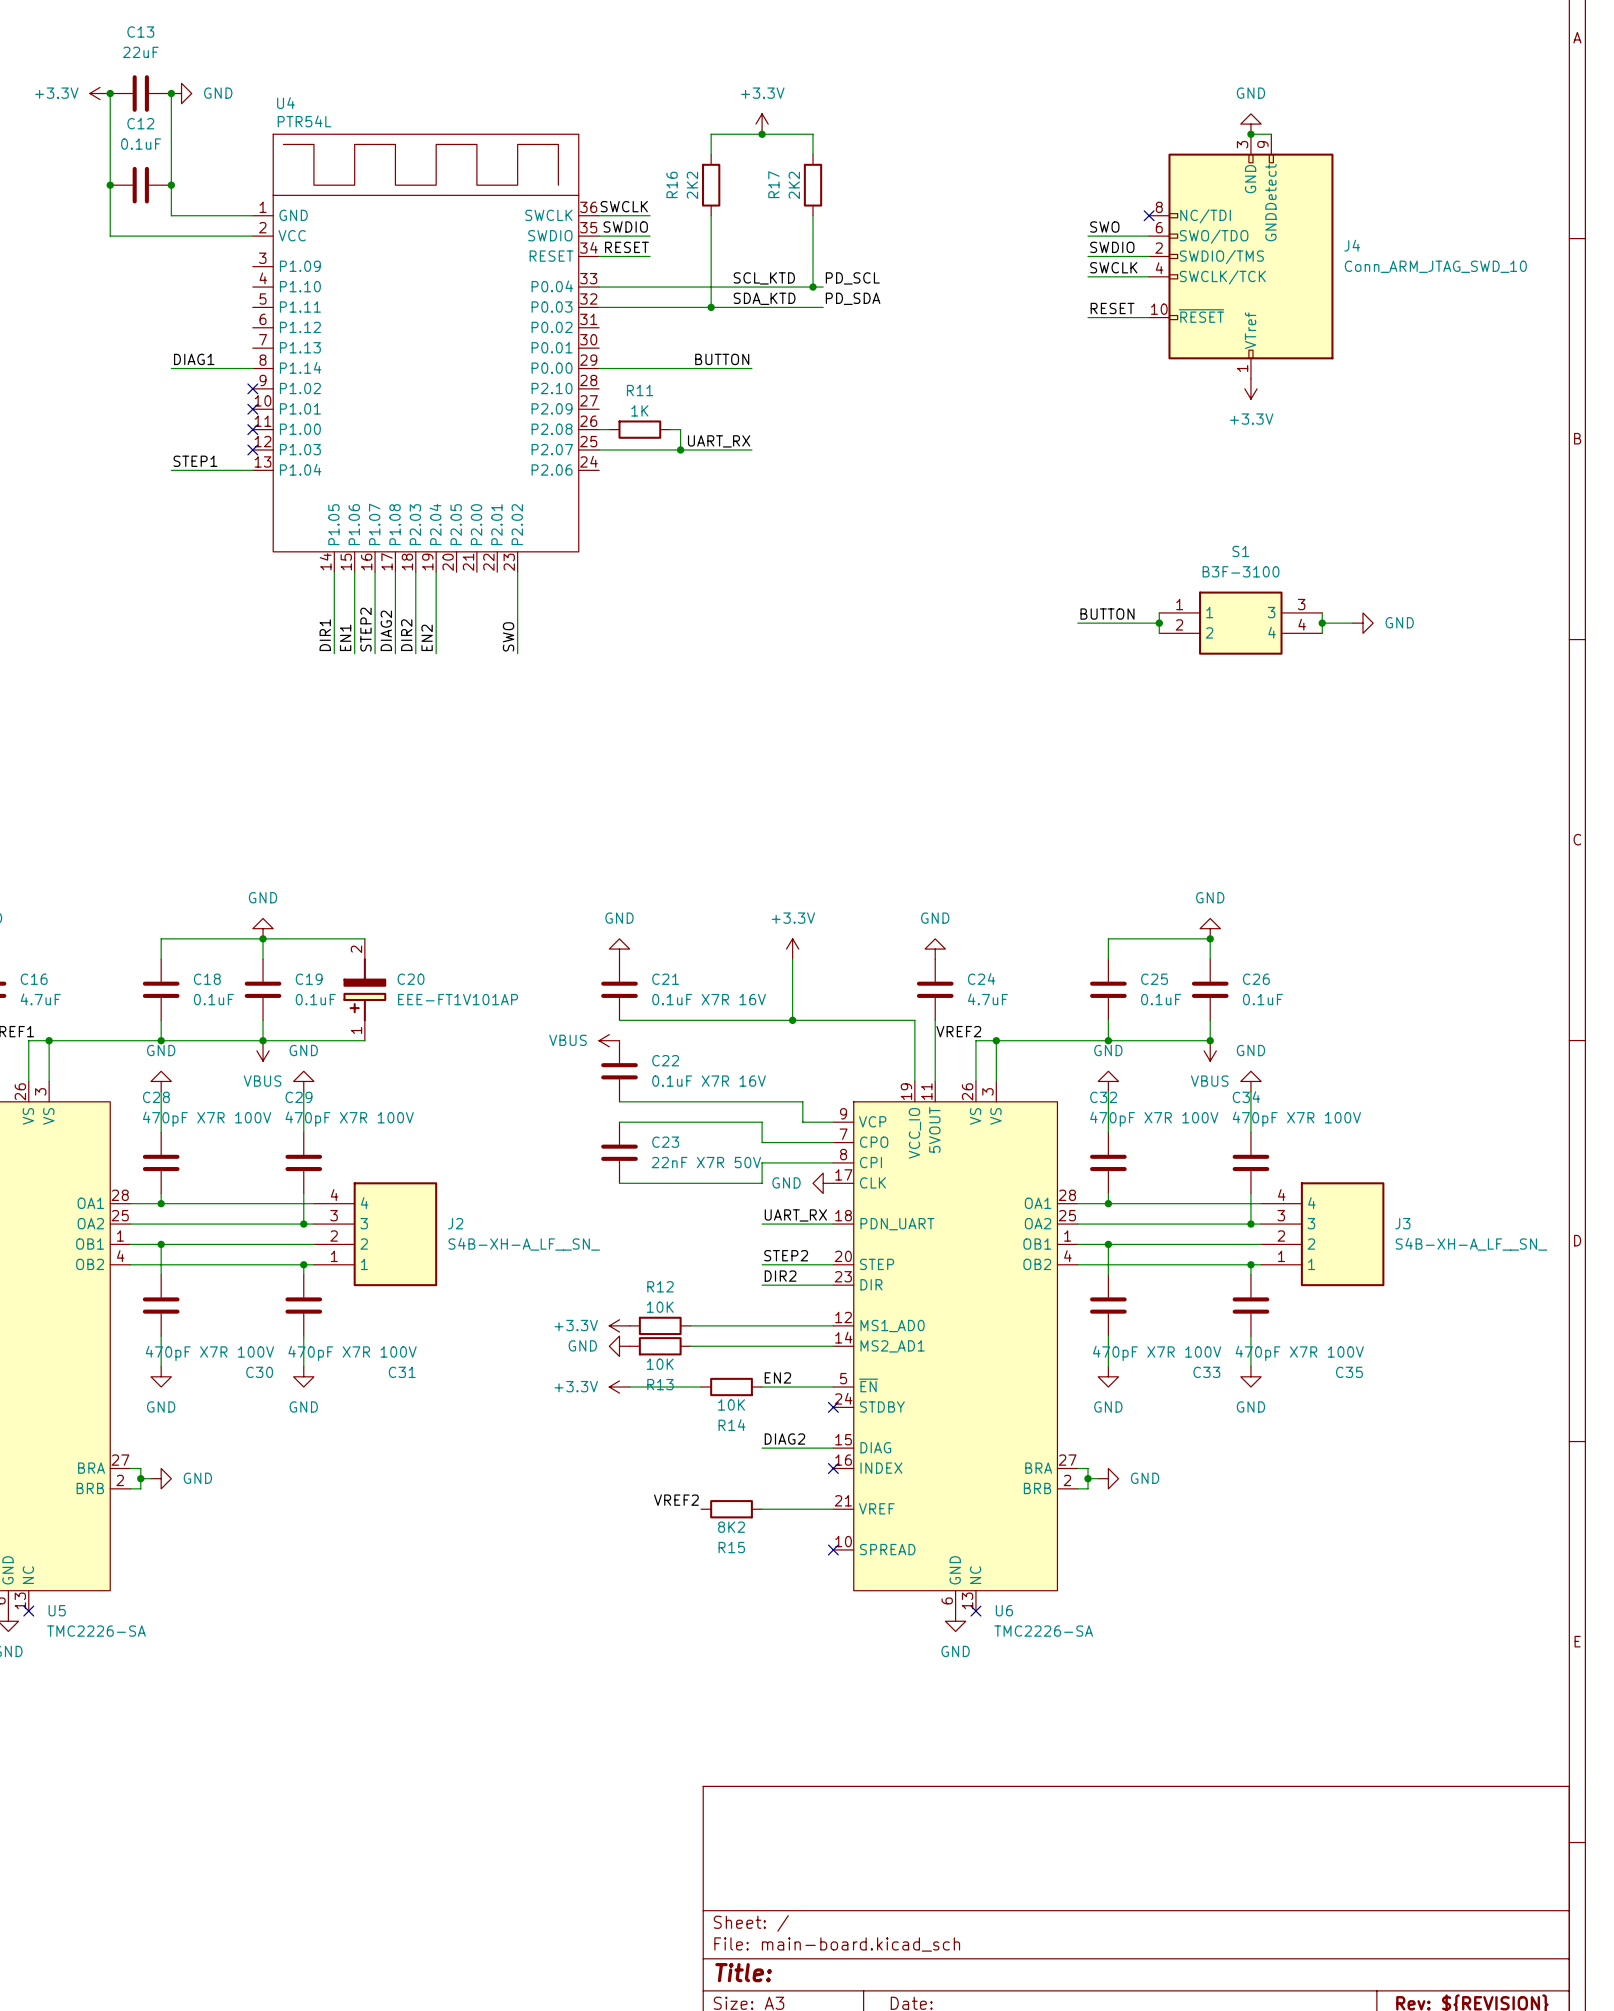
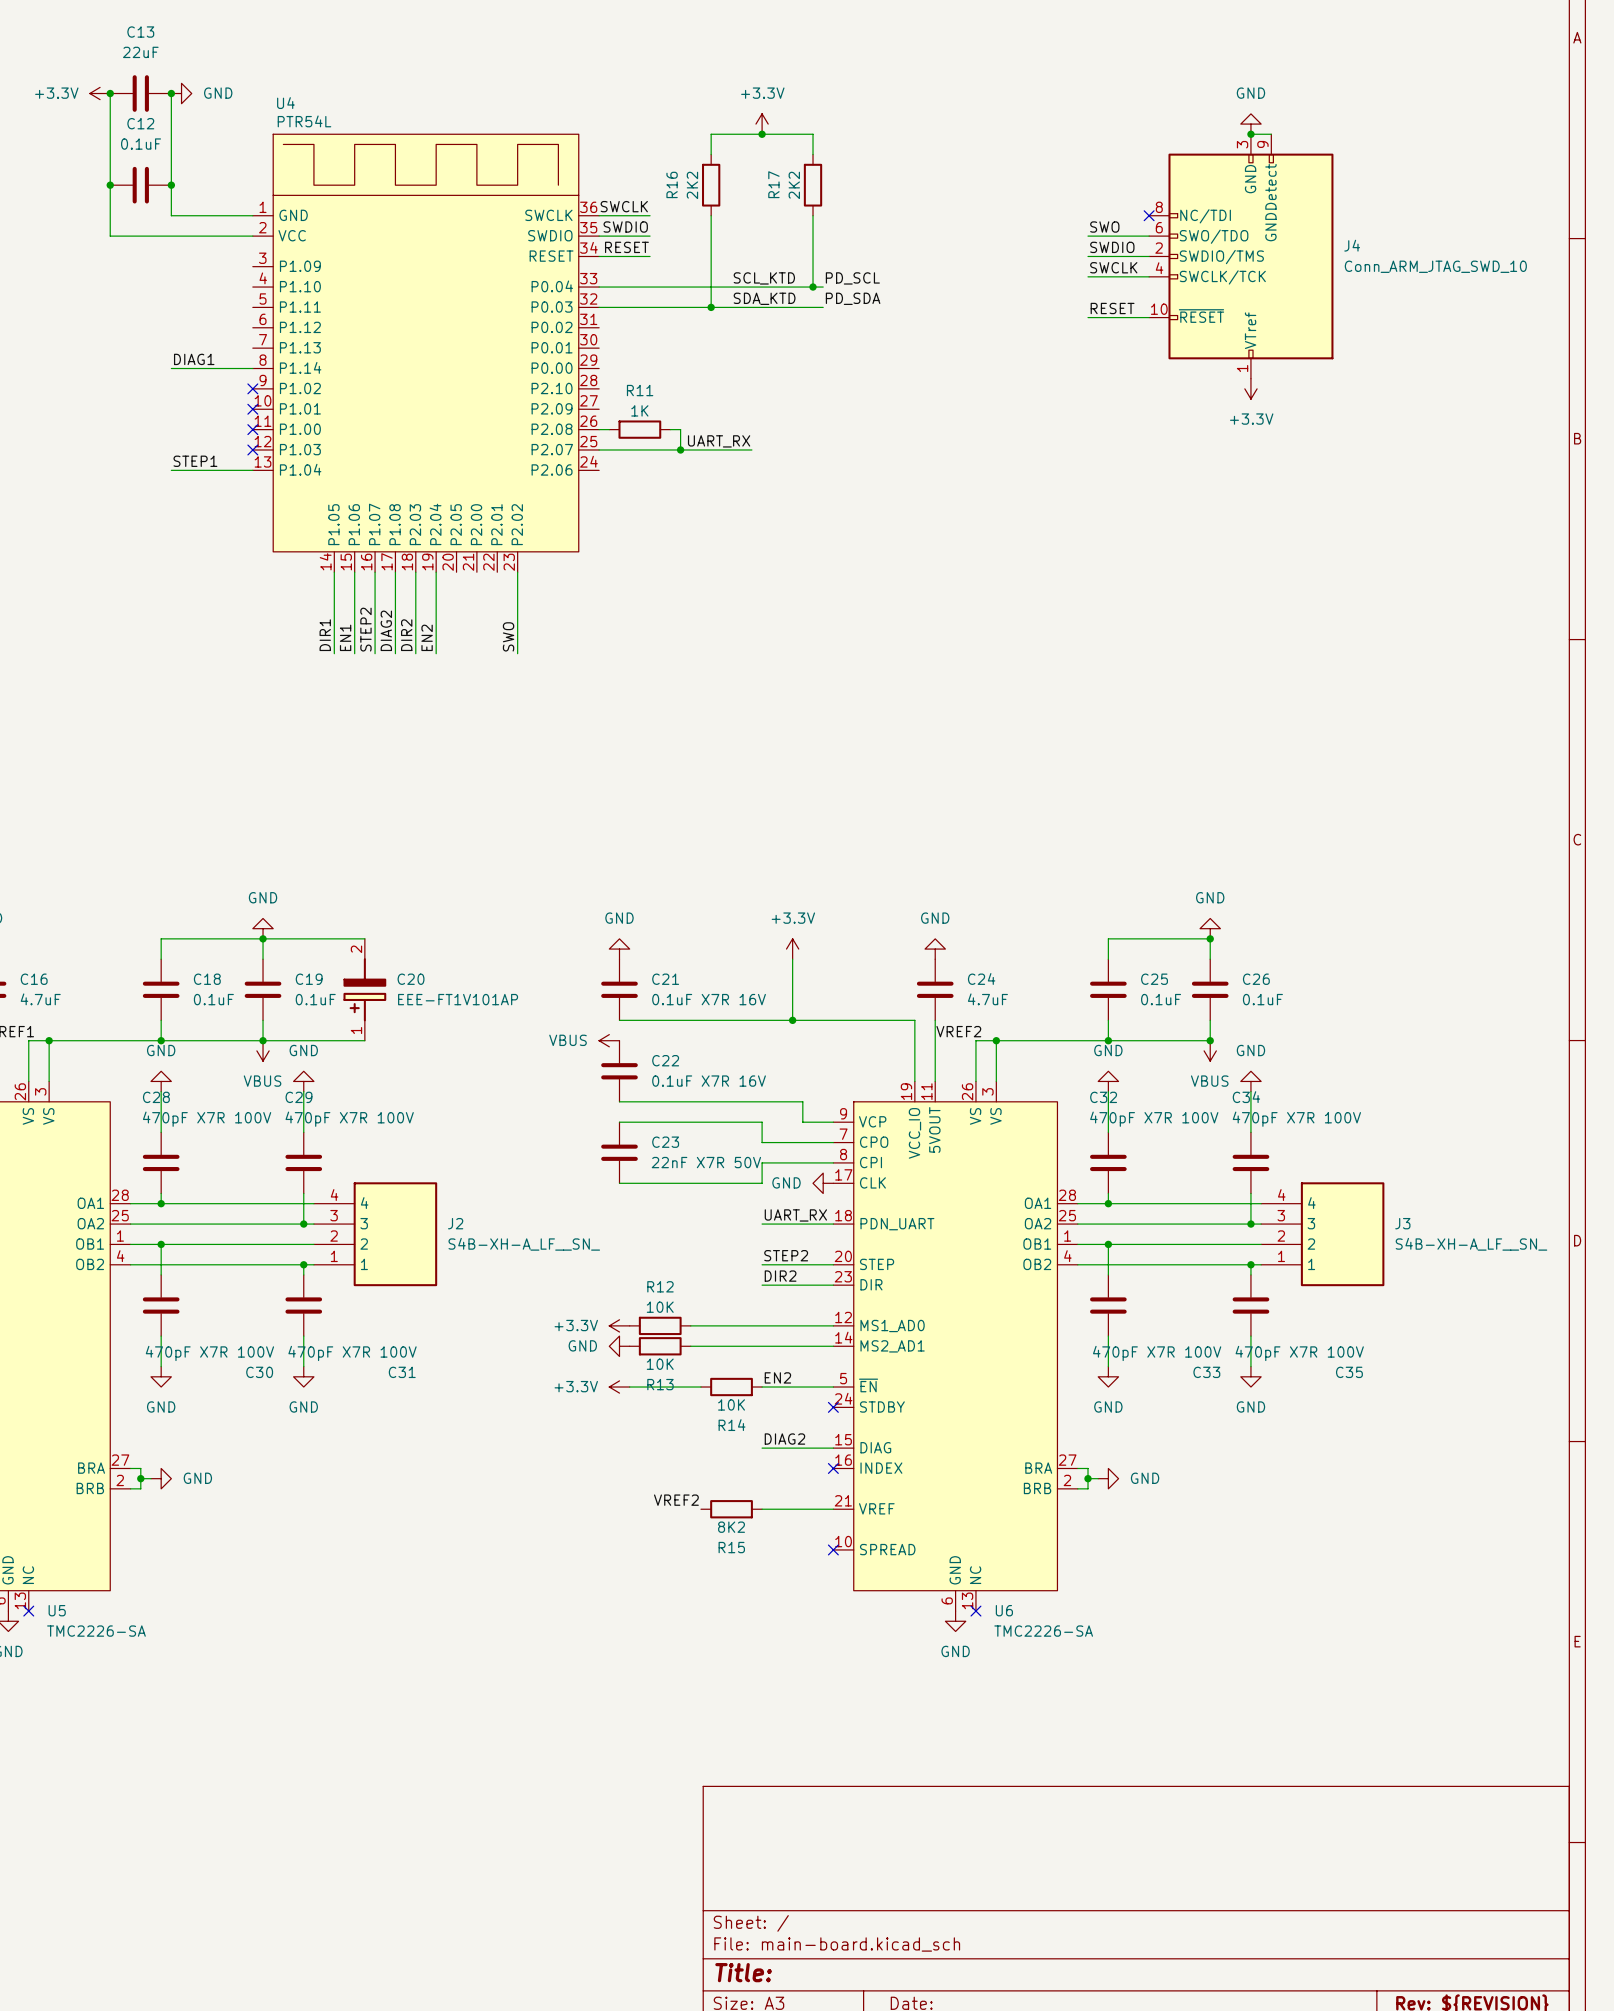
U4 symbol: [252, 134, 600, 573] -> [252, 134, 600, 573]
label: BUTTON (722, 359) -> none
wire: (599, 368) (751, 368) -> none
wire: (1159, 612) (1159, 633) -> none
wire: (1322, 612) (1322, 633) -> none
label: BUTTON (1107, 614) -> none
wire: (1077, 623) (1159, 623) -> none
junction: (1159, 623) -> none
S1: B3F-3100 (1240, 623) -> none
wire: (1322, 623) (1352, 623) -> none
junction: (1322, 623) -> none
power symbol: GND (1363, 623) -> none

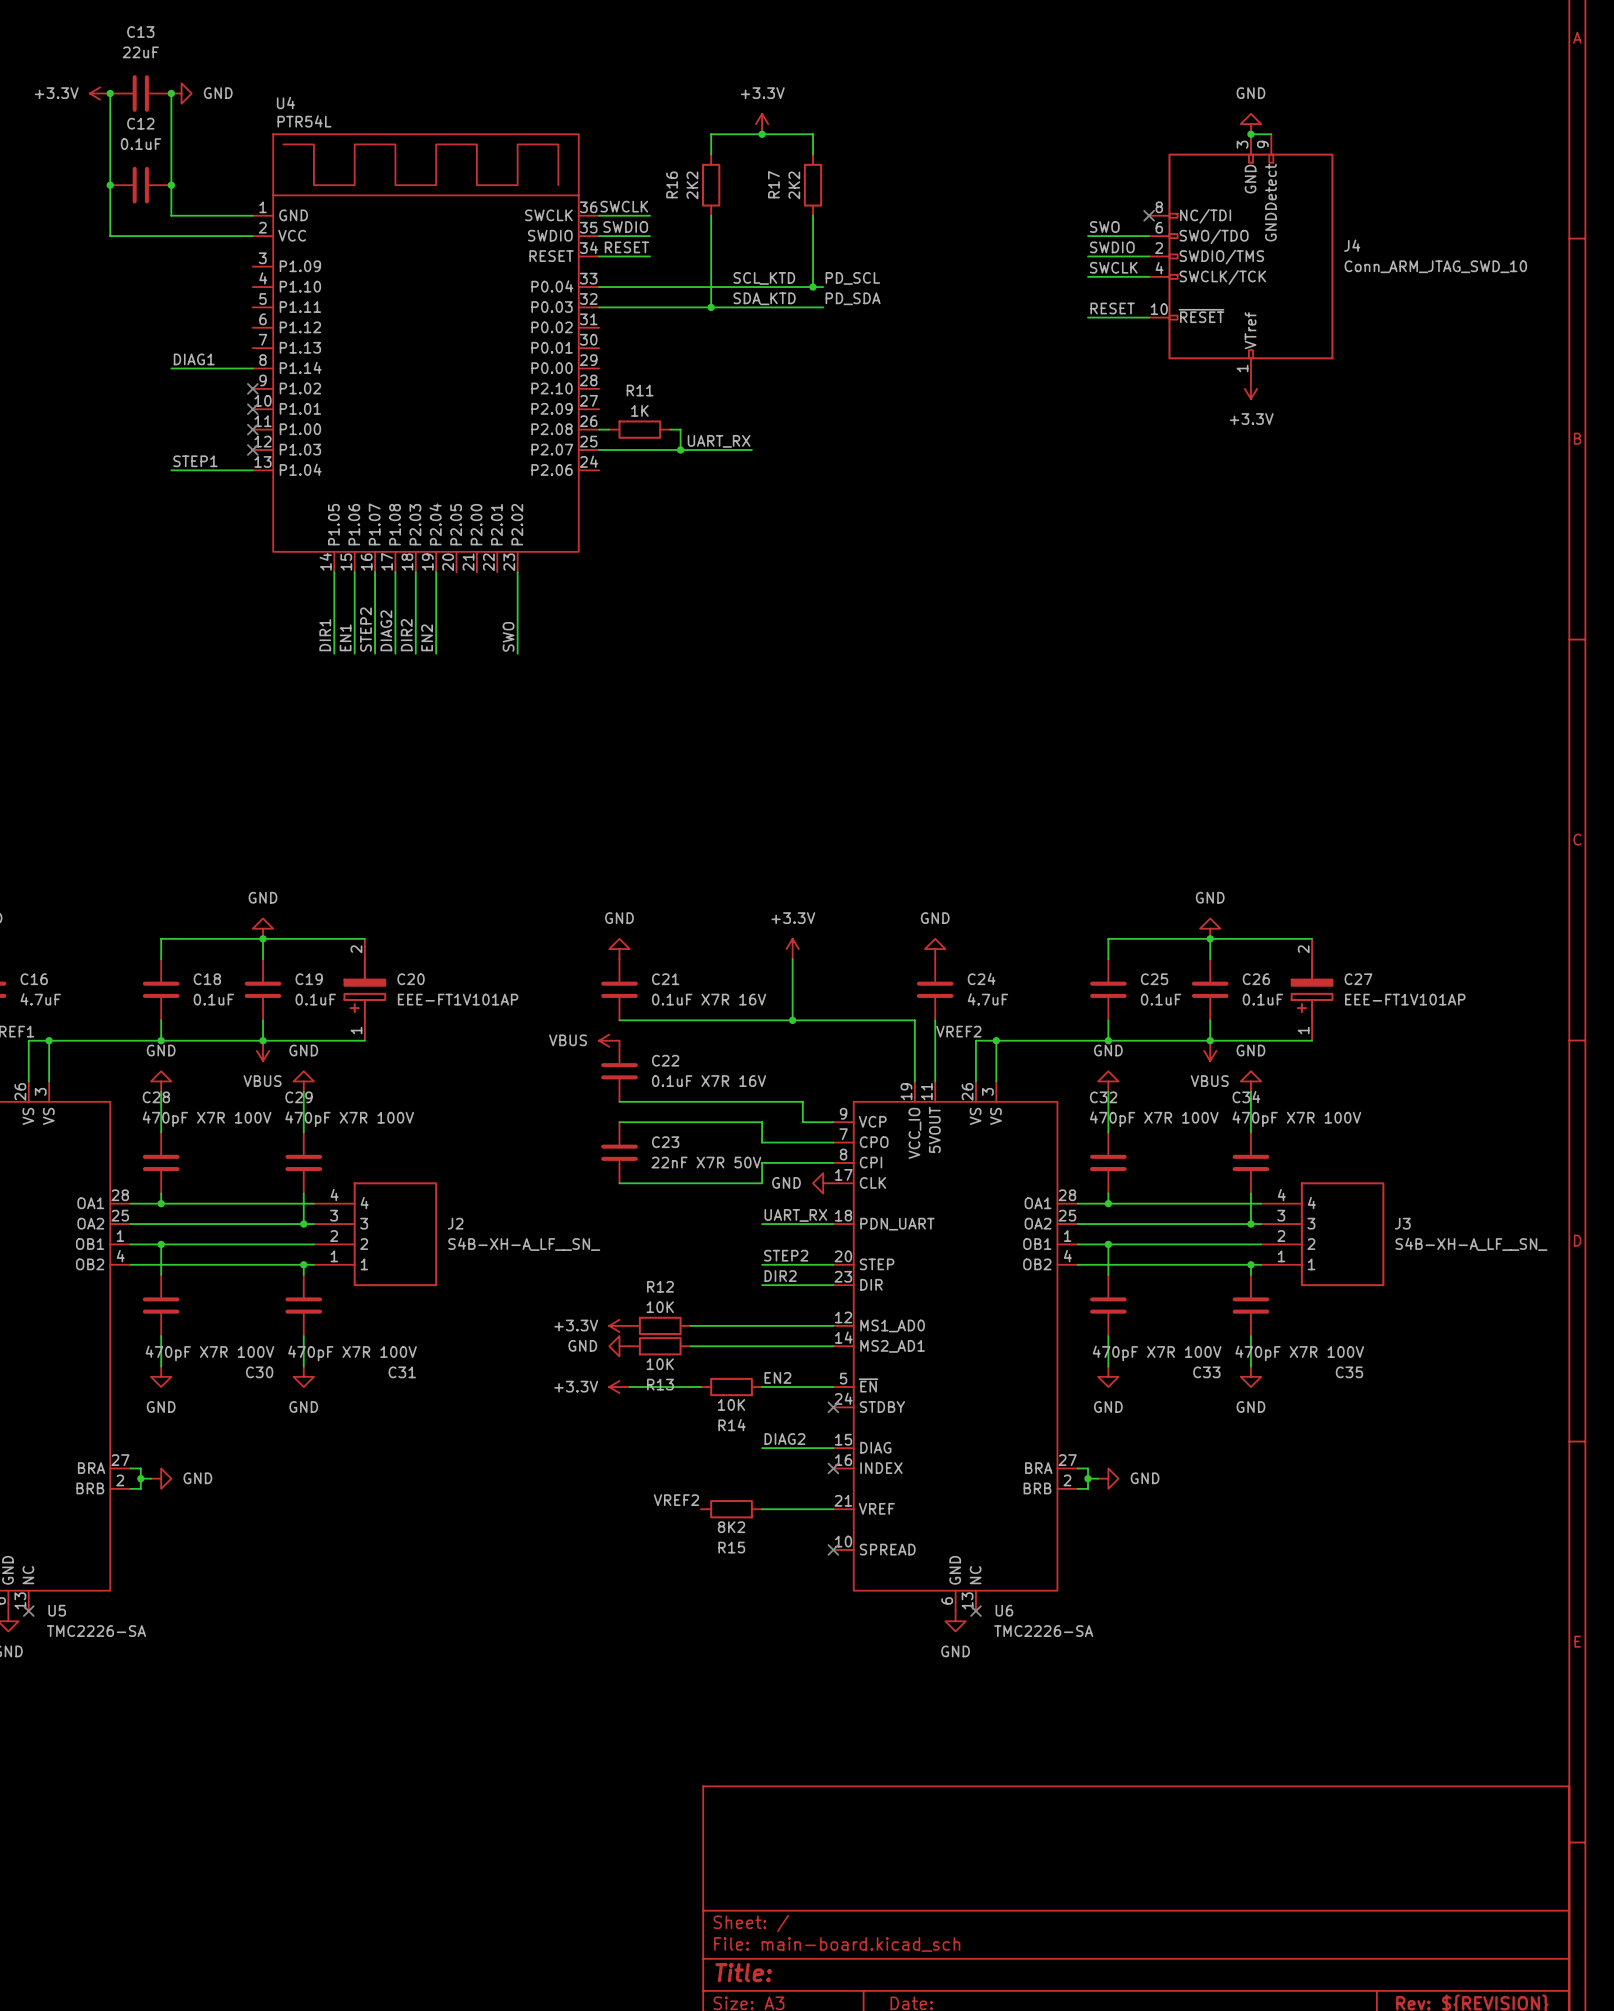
wire: none -> (1210, 938) (1312, 938)
C27: none -> EEE-FT1V101AP (1312, 989)
wire: none -> (1210, 1040) (1312, 1040)

